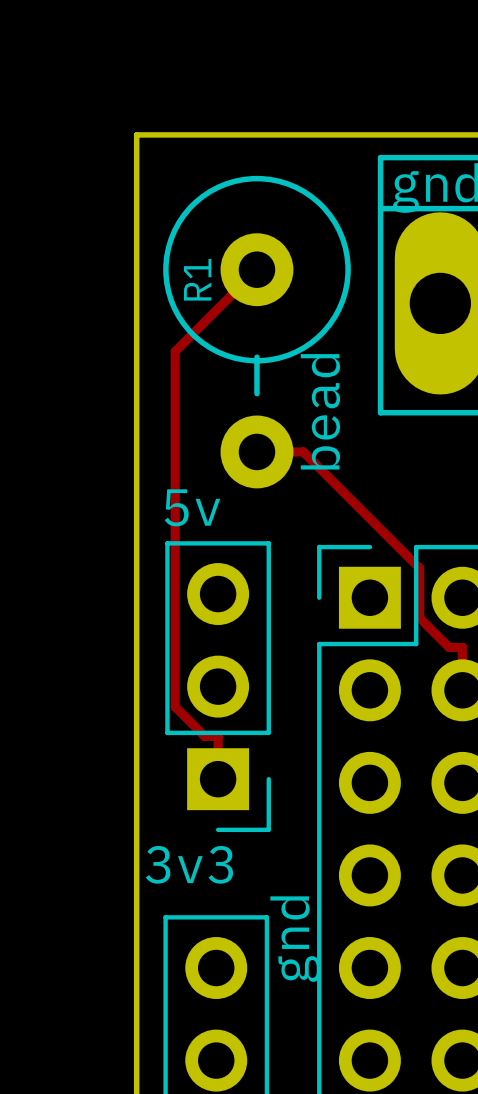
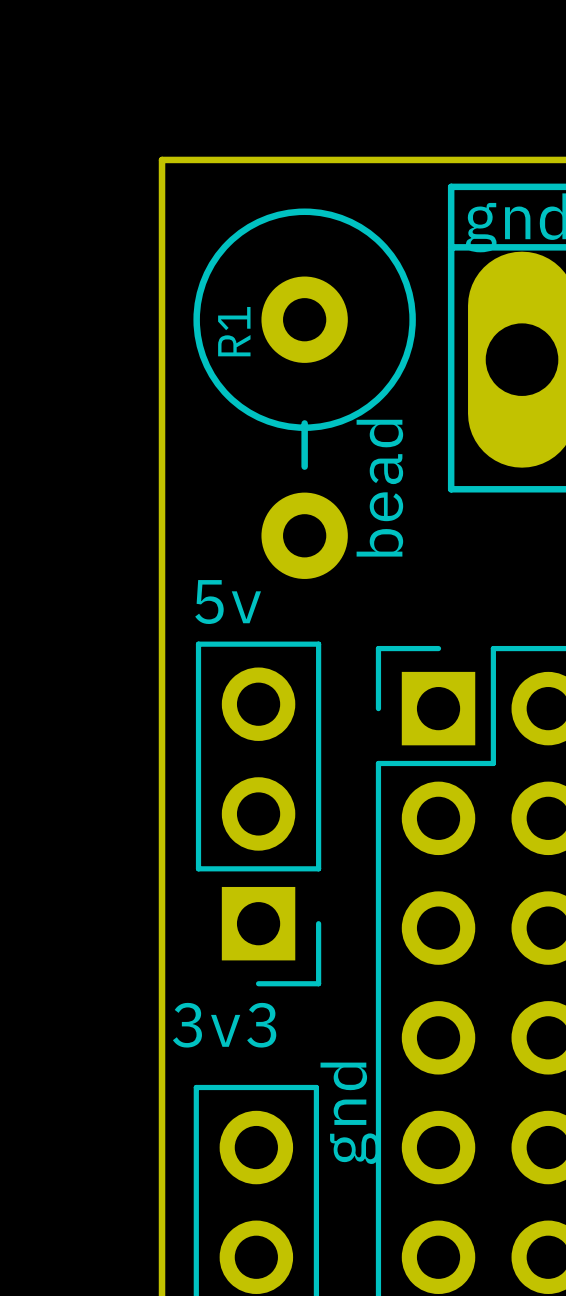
track: (256, 269) (175, 351) (175, 706) (204, 736) (218, 736) (218, 779) -> none
track: (256, 451) (303, 451) (419, 568) (419, 618) (449, 647) (462, 647) (462, 690) -> none

